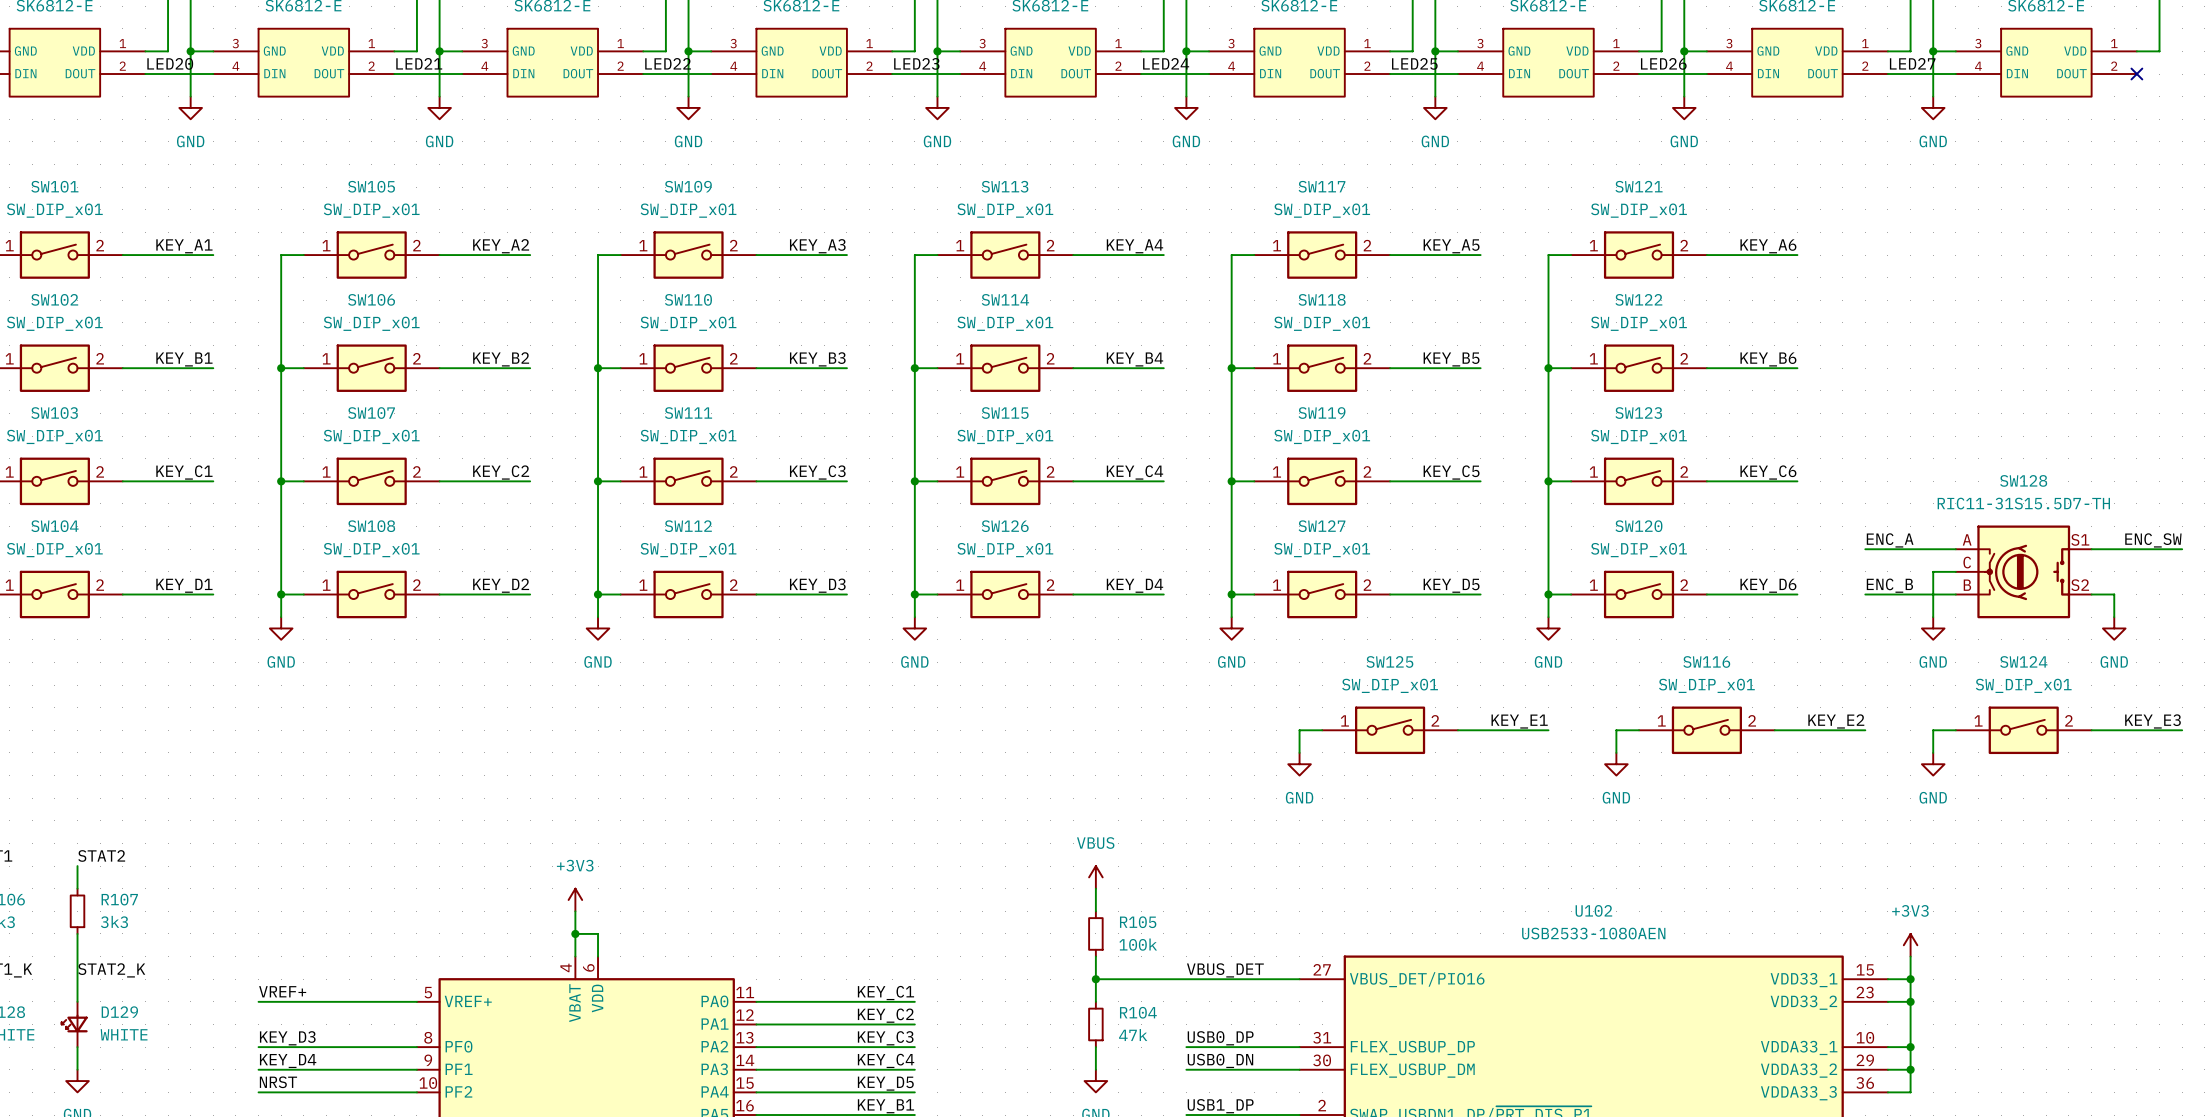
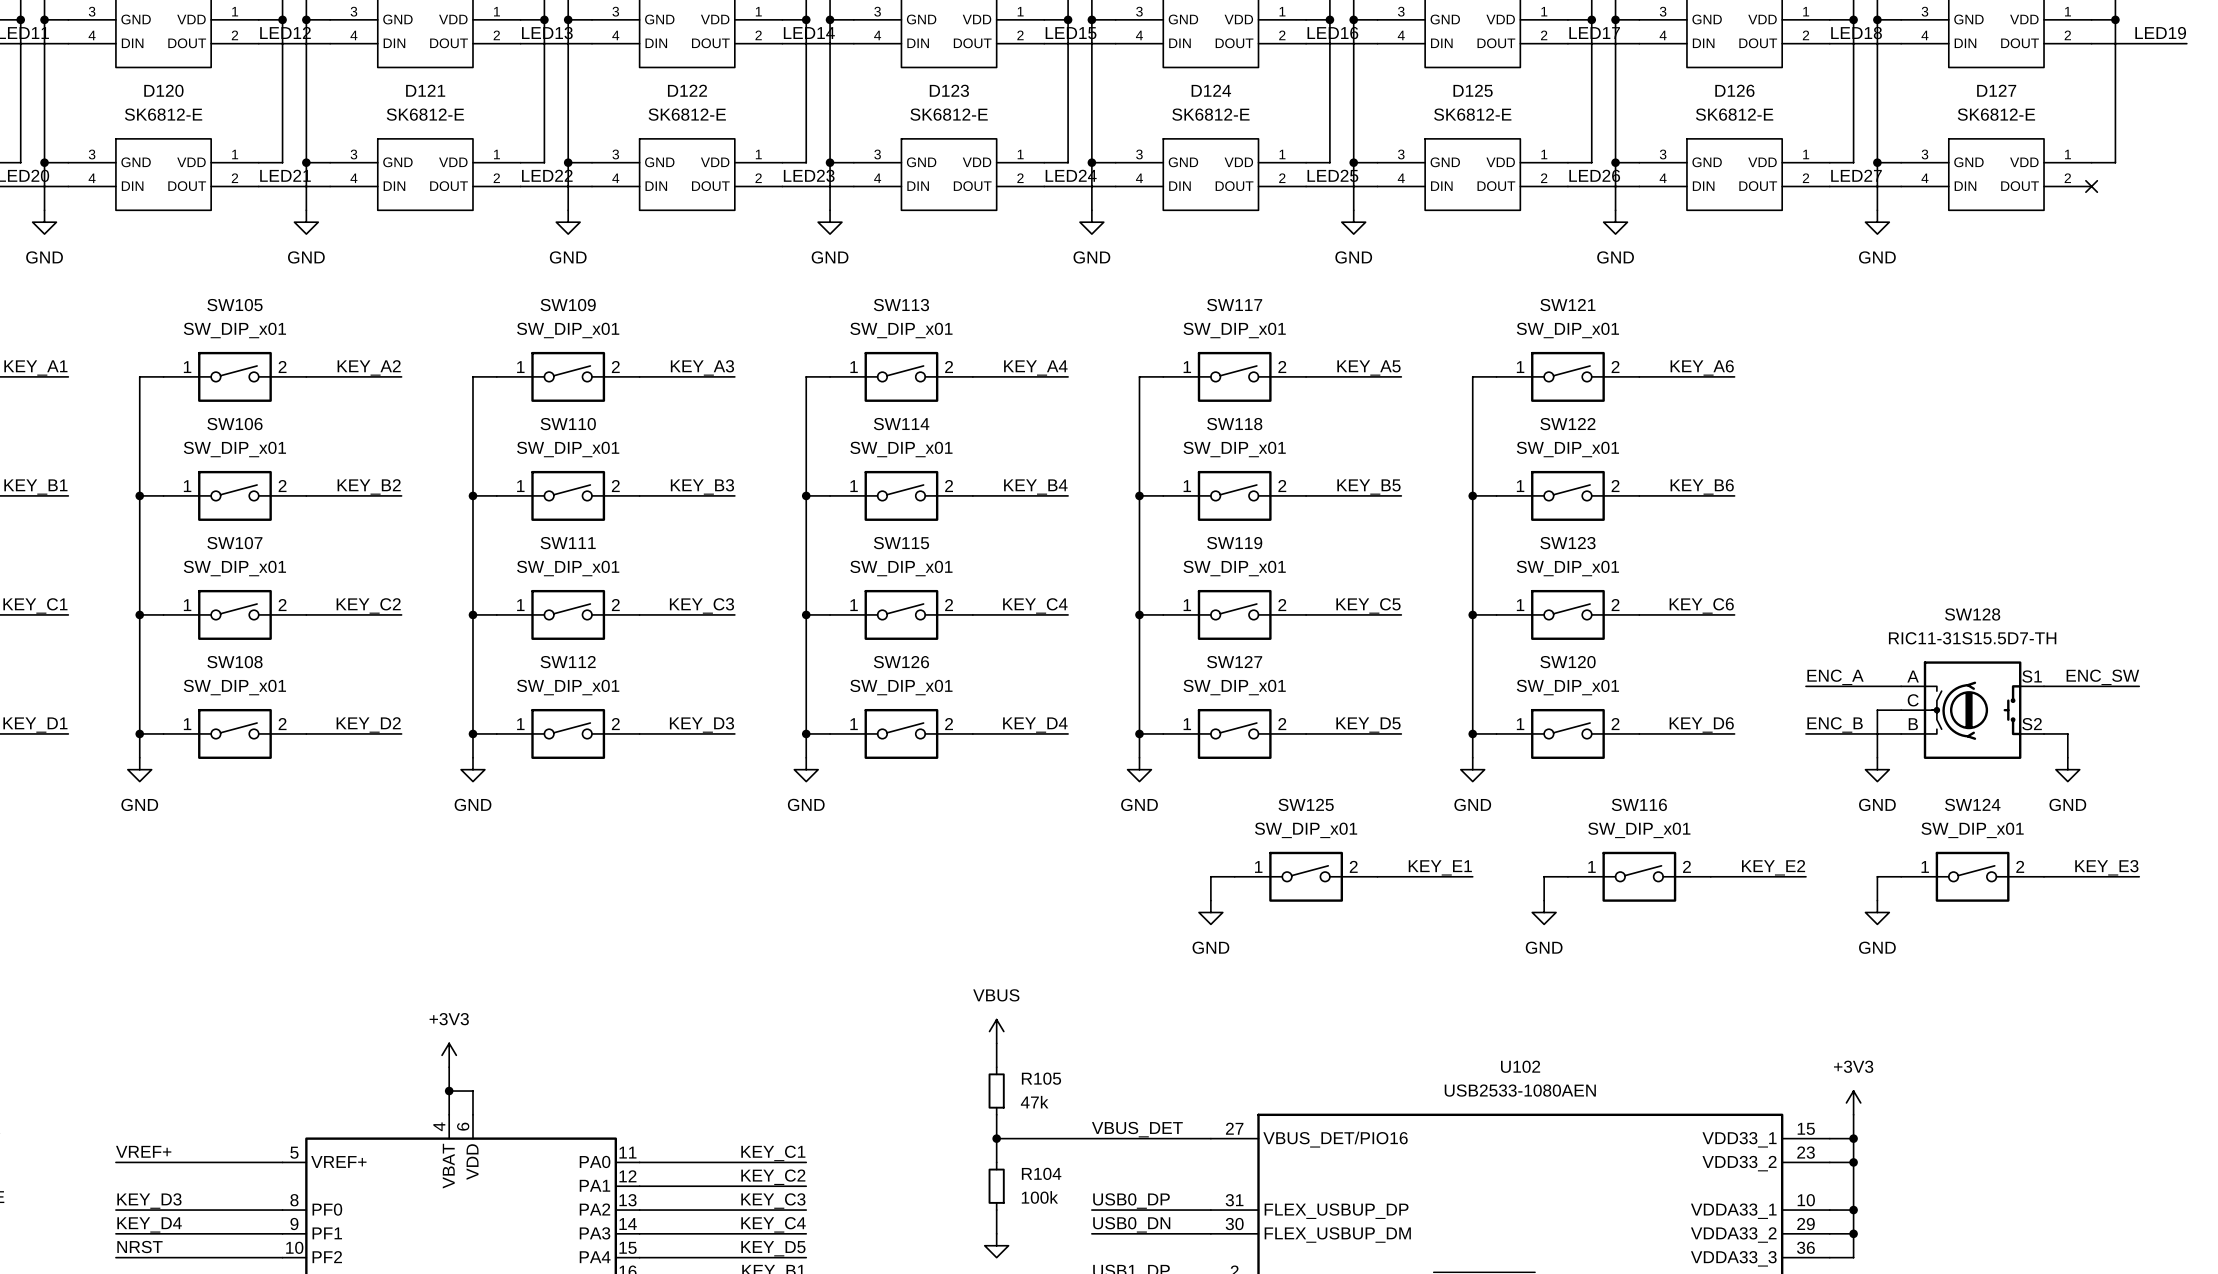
R105 value: 100k (1138, 944) -> 47k (1034, 1102)
R104 value: 47k (1133, 1035) -> 100k (1039, 1197)

